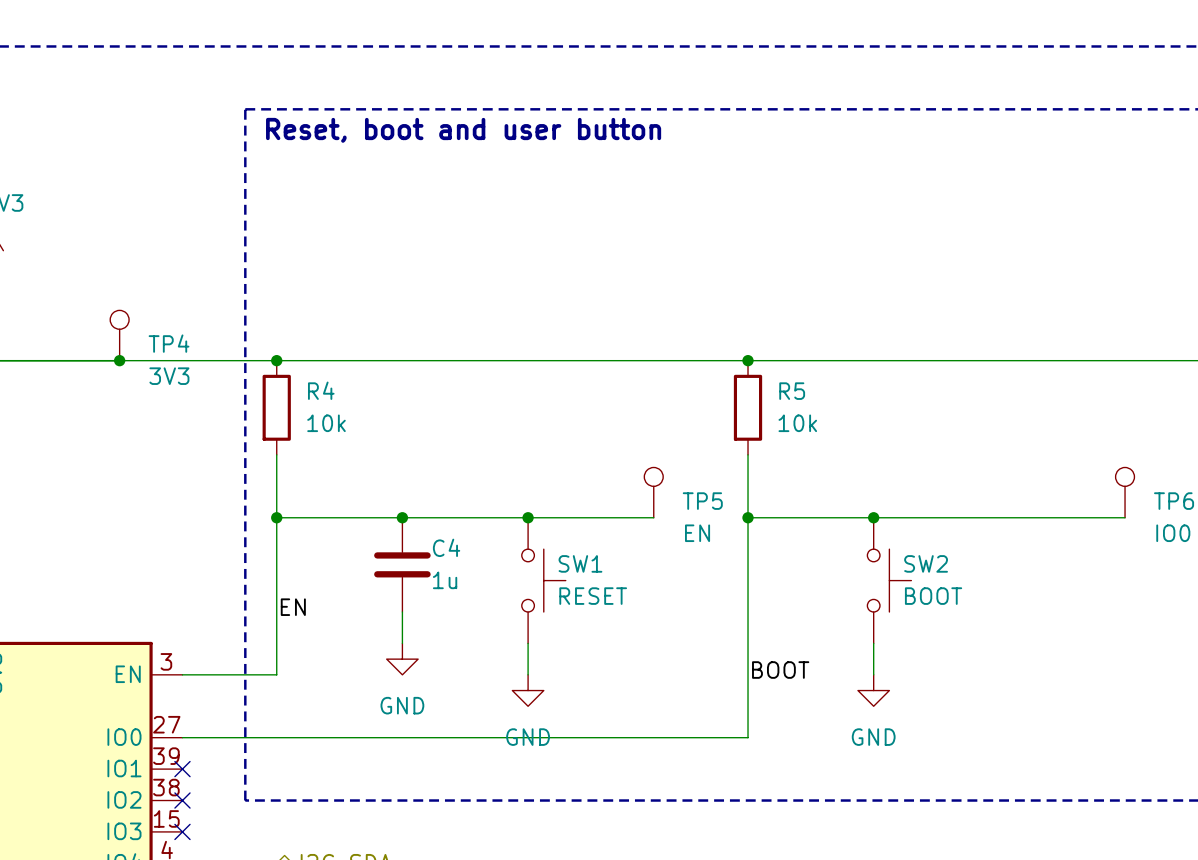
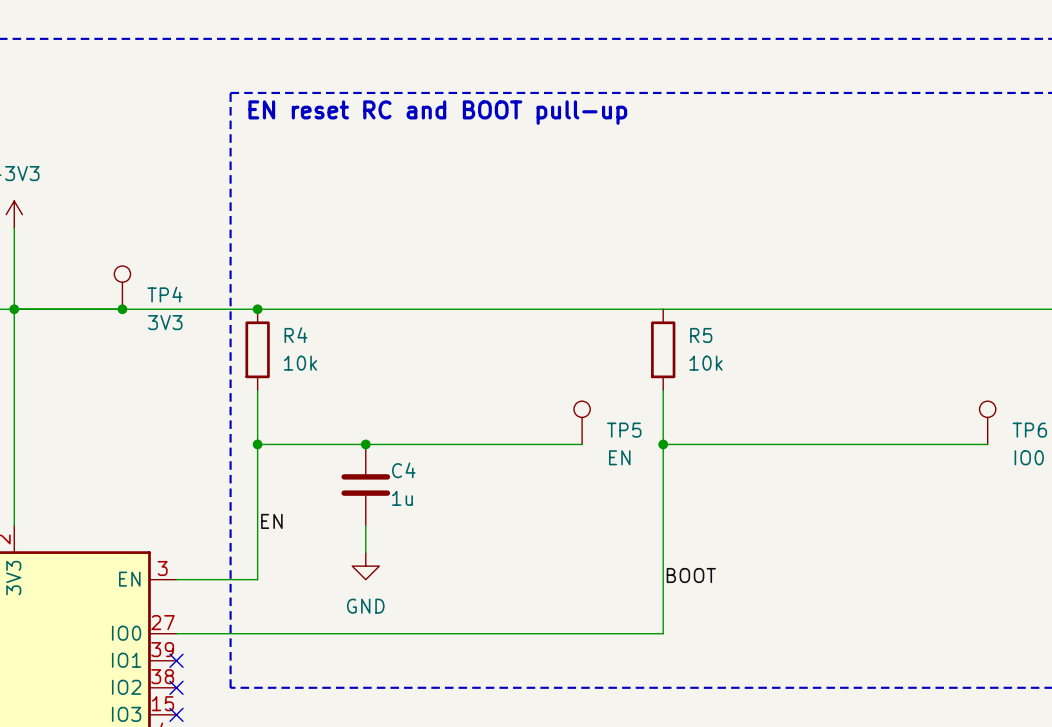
text: Reset, boot and user button (463, 130) -> EN reset RC and BOOT pull-up (437, 112)
junction: (748, 360) -> none
junction: (528, 517) -> none
junction: (873, 517) -> none
SW1: RESET (543, 580) -> none
SW2: BOOT (889, 580) -> none
wire: (528, 643) (528, 674) -> none
wire: (873, 643) (873, 674) -> none
power symbol: GND (528, 690) -> none
power symbol: GND (873, 690) -> none

